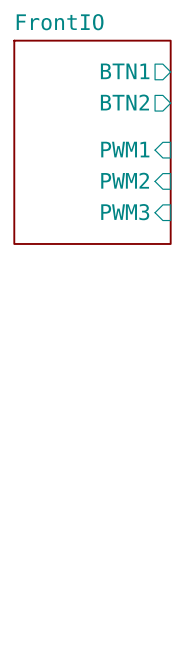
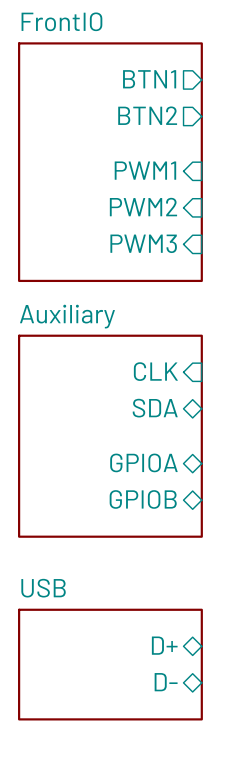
sheet pin: none -> CLK (155, 371)
sheet pin: none -> SDA (155, 408)
sheet Auxiliary: none -> (110, 436)
sheet pin: none -> GPIOA (143, 462)
sheet pin: none -> GPIOB (143, 499)
sheet pin: none -> D+ (164, 645)
sheet USB: none -> (110, 664)
sheet pin: none -> D- (166, 682)

